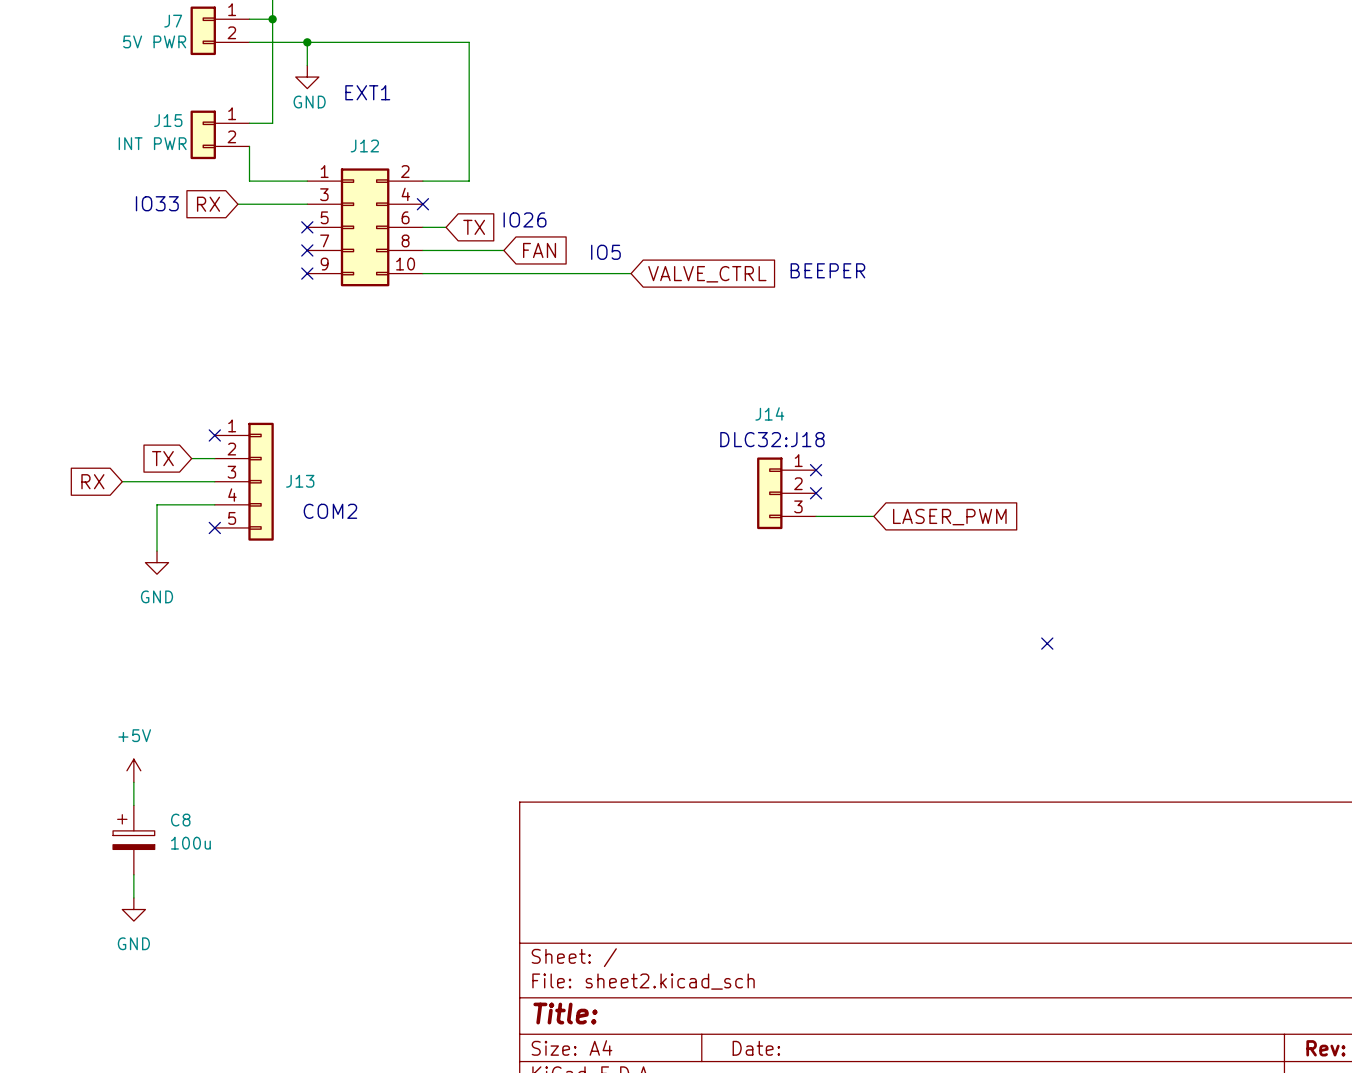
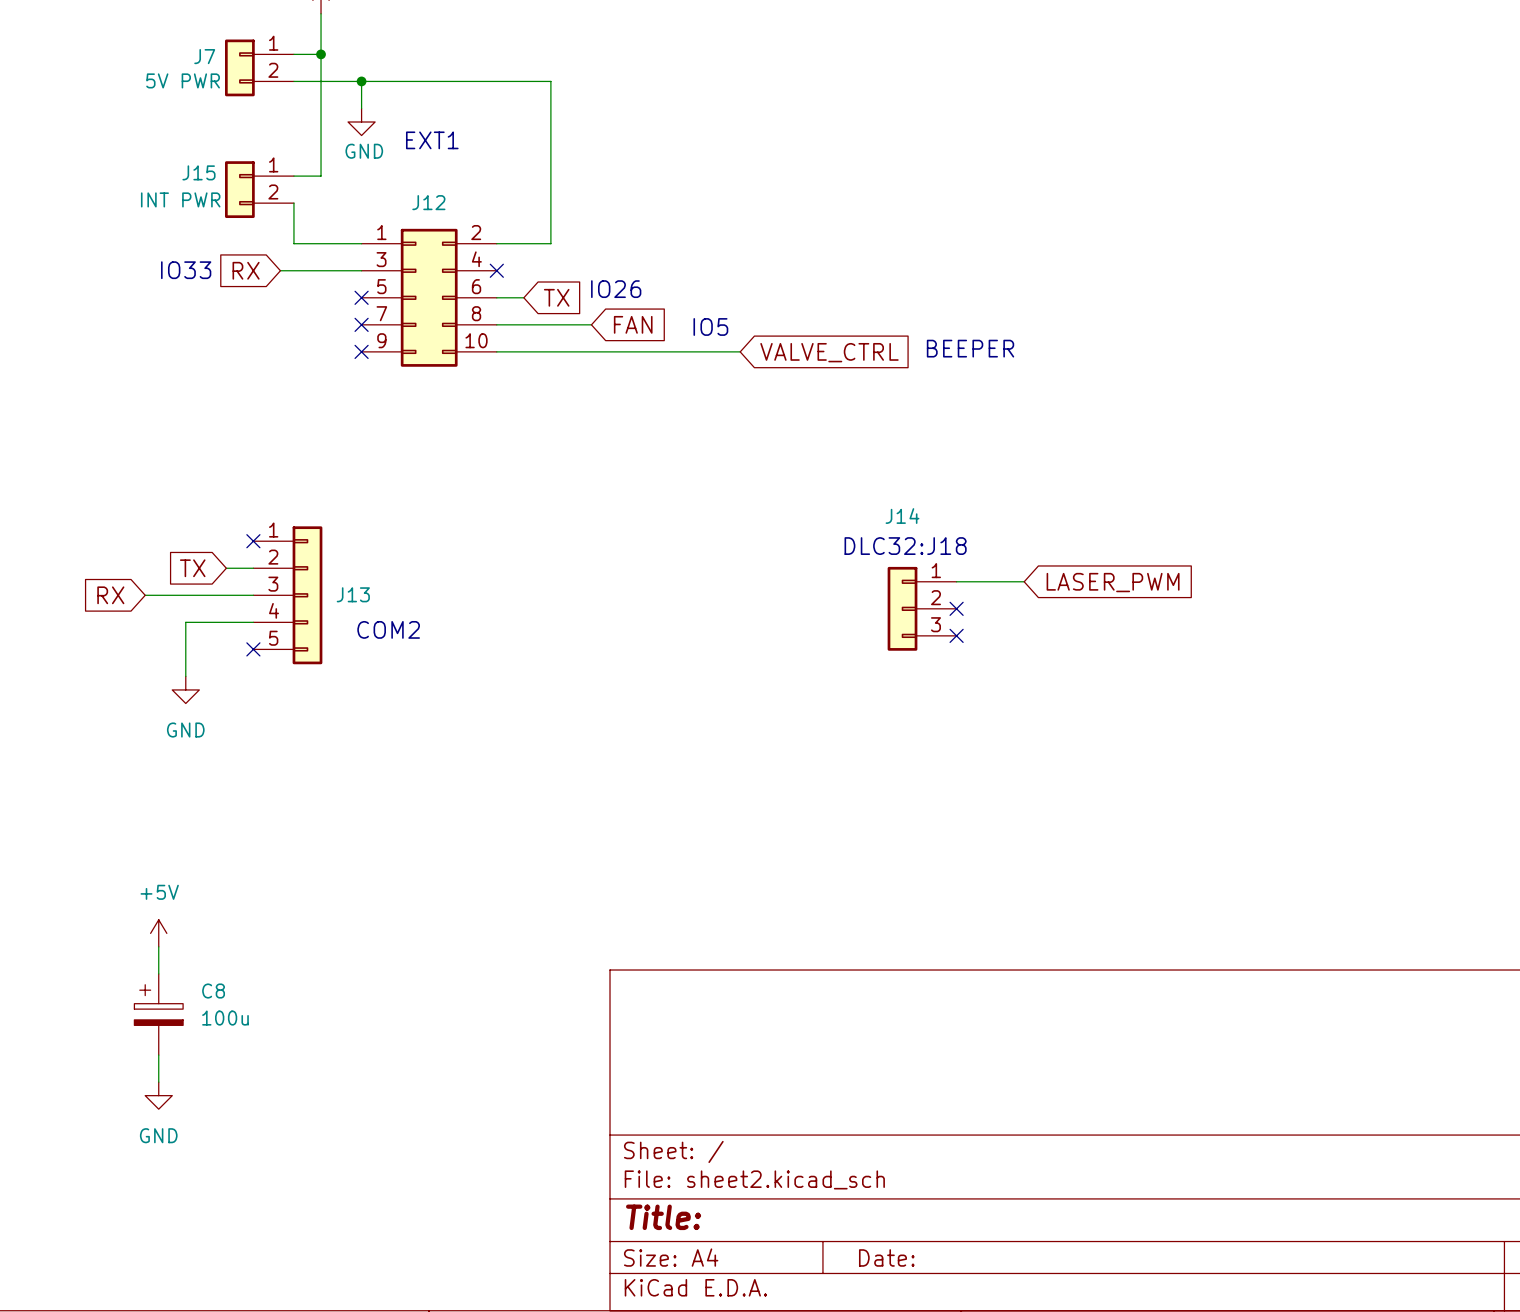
no-connect mark position: (816, 470) -> (956, 635)
wire: (816, 516) (873, 516) -> (956, 581) (1024, 581)
global label position: LASER_PWM (949, 517) -> LASER_PWM (1113, 582)
no-connect mark: (1047, 643) -> none

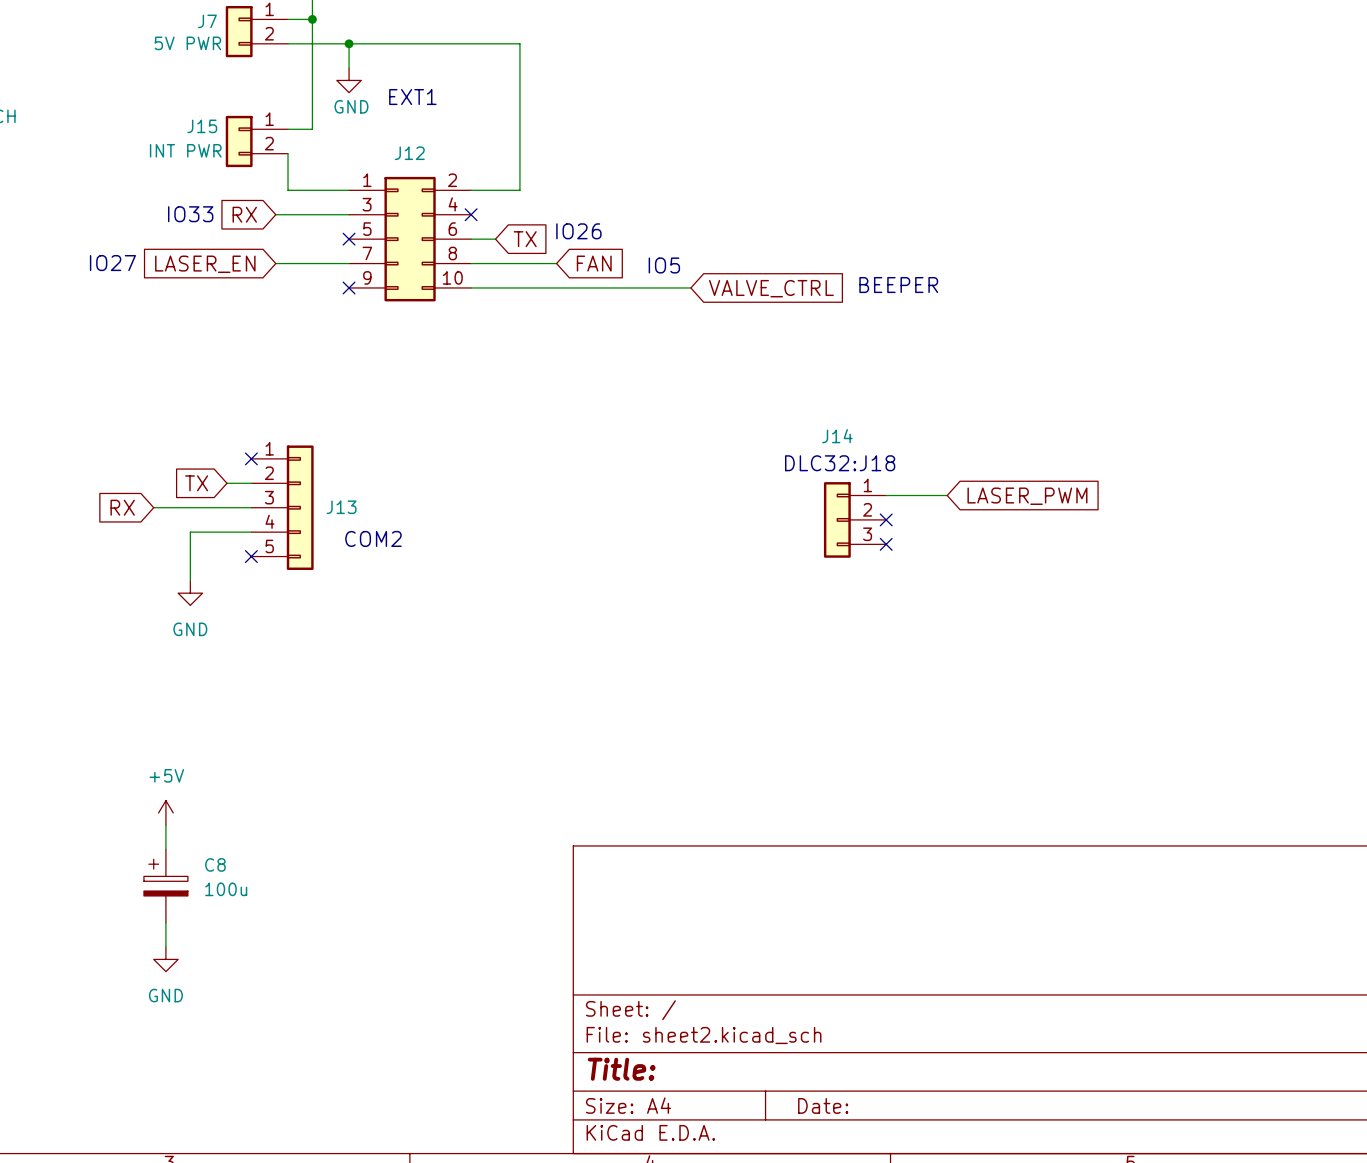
text: none -> IO27 (112, 263)
wire: none -> (275, 263) (349, 263)
no-connect mark: (361, 324) -> none
global label: none -> LASER_EN (205, 264)

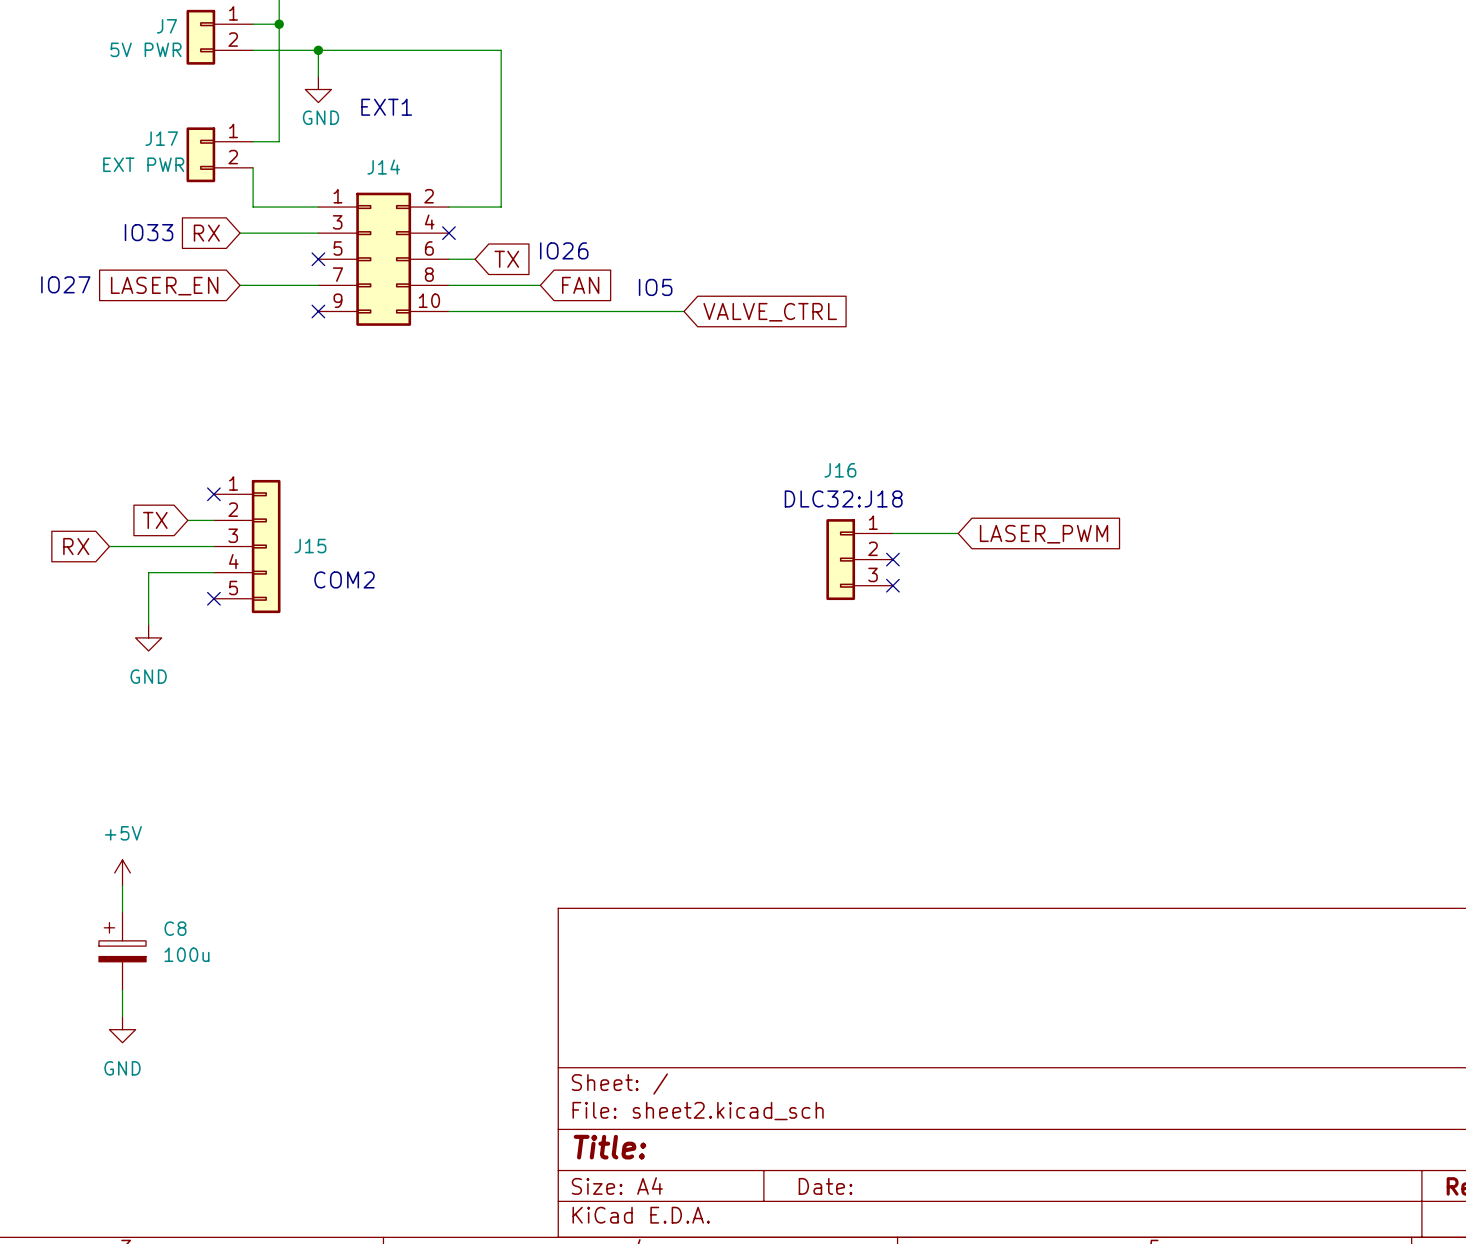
J15 name: J15 (202, 126) -> J17 (161, 138)
J15 value: INT PWR (185, 150) -> EXT PWR (143, 164)
J12 name: J12 (409, 153) -> J14 (383, 167)
text: BEEPER (898, 285) -> none
J14 name: J14 (837, 436) -> J16 (840, 470)
J13 name: J13 (341, 507) -> J15 (310, 546)

